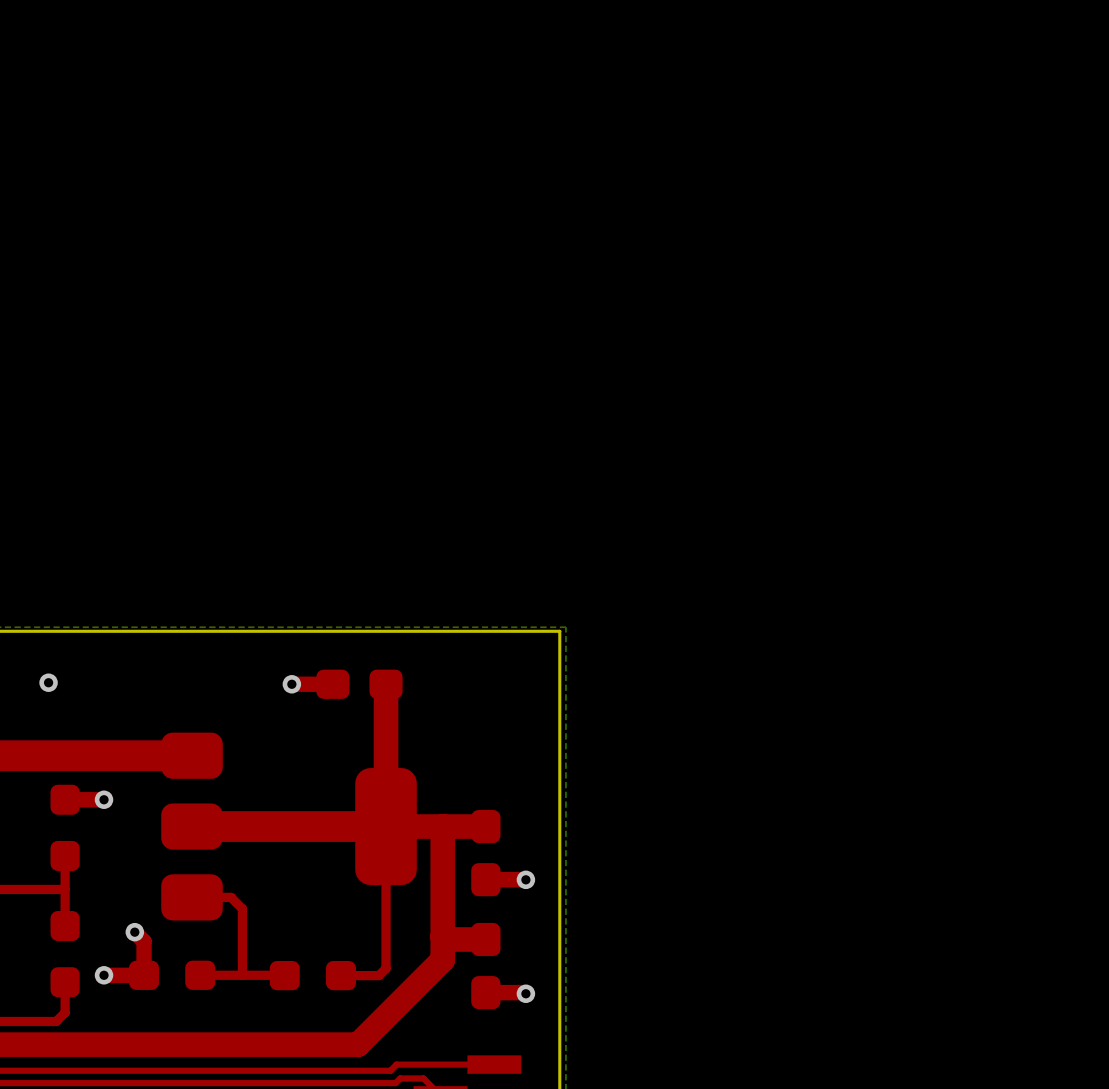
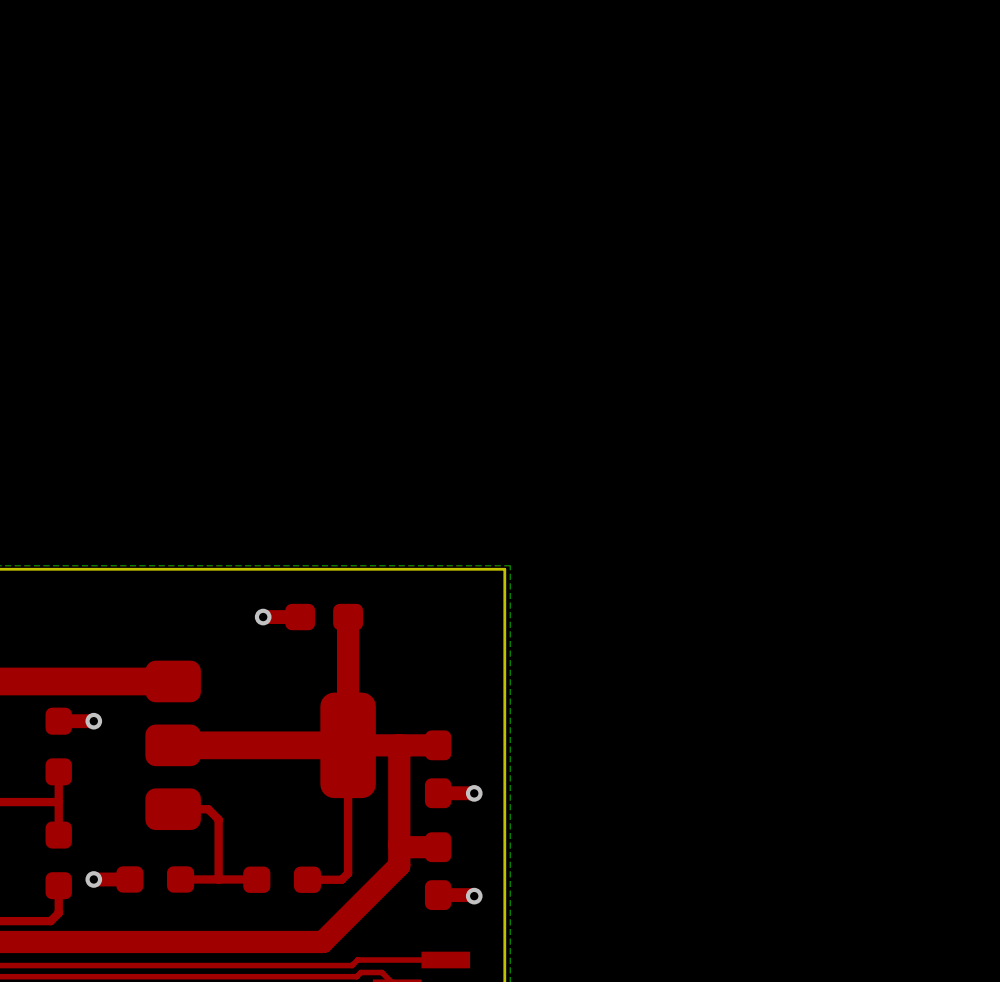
via: (48, 682) -> none
top track: (134, 932) (144, 941) (144, 975) -> none
via: (134, 932) -> none

